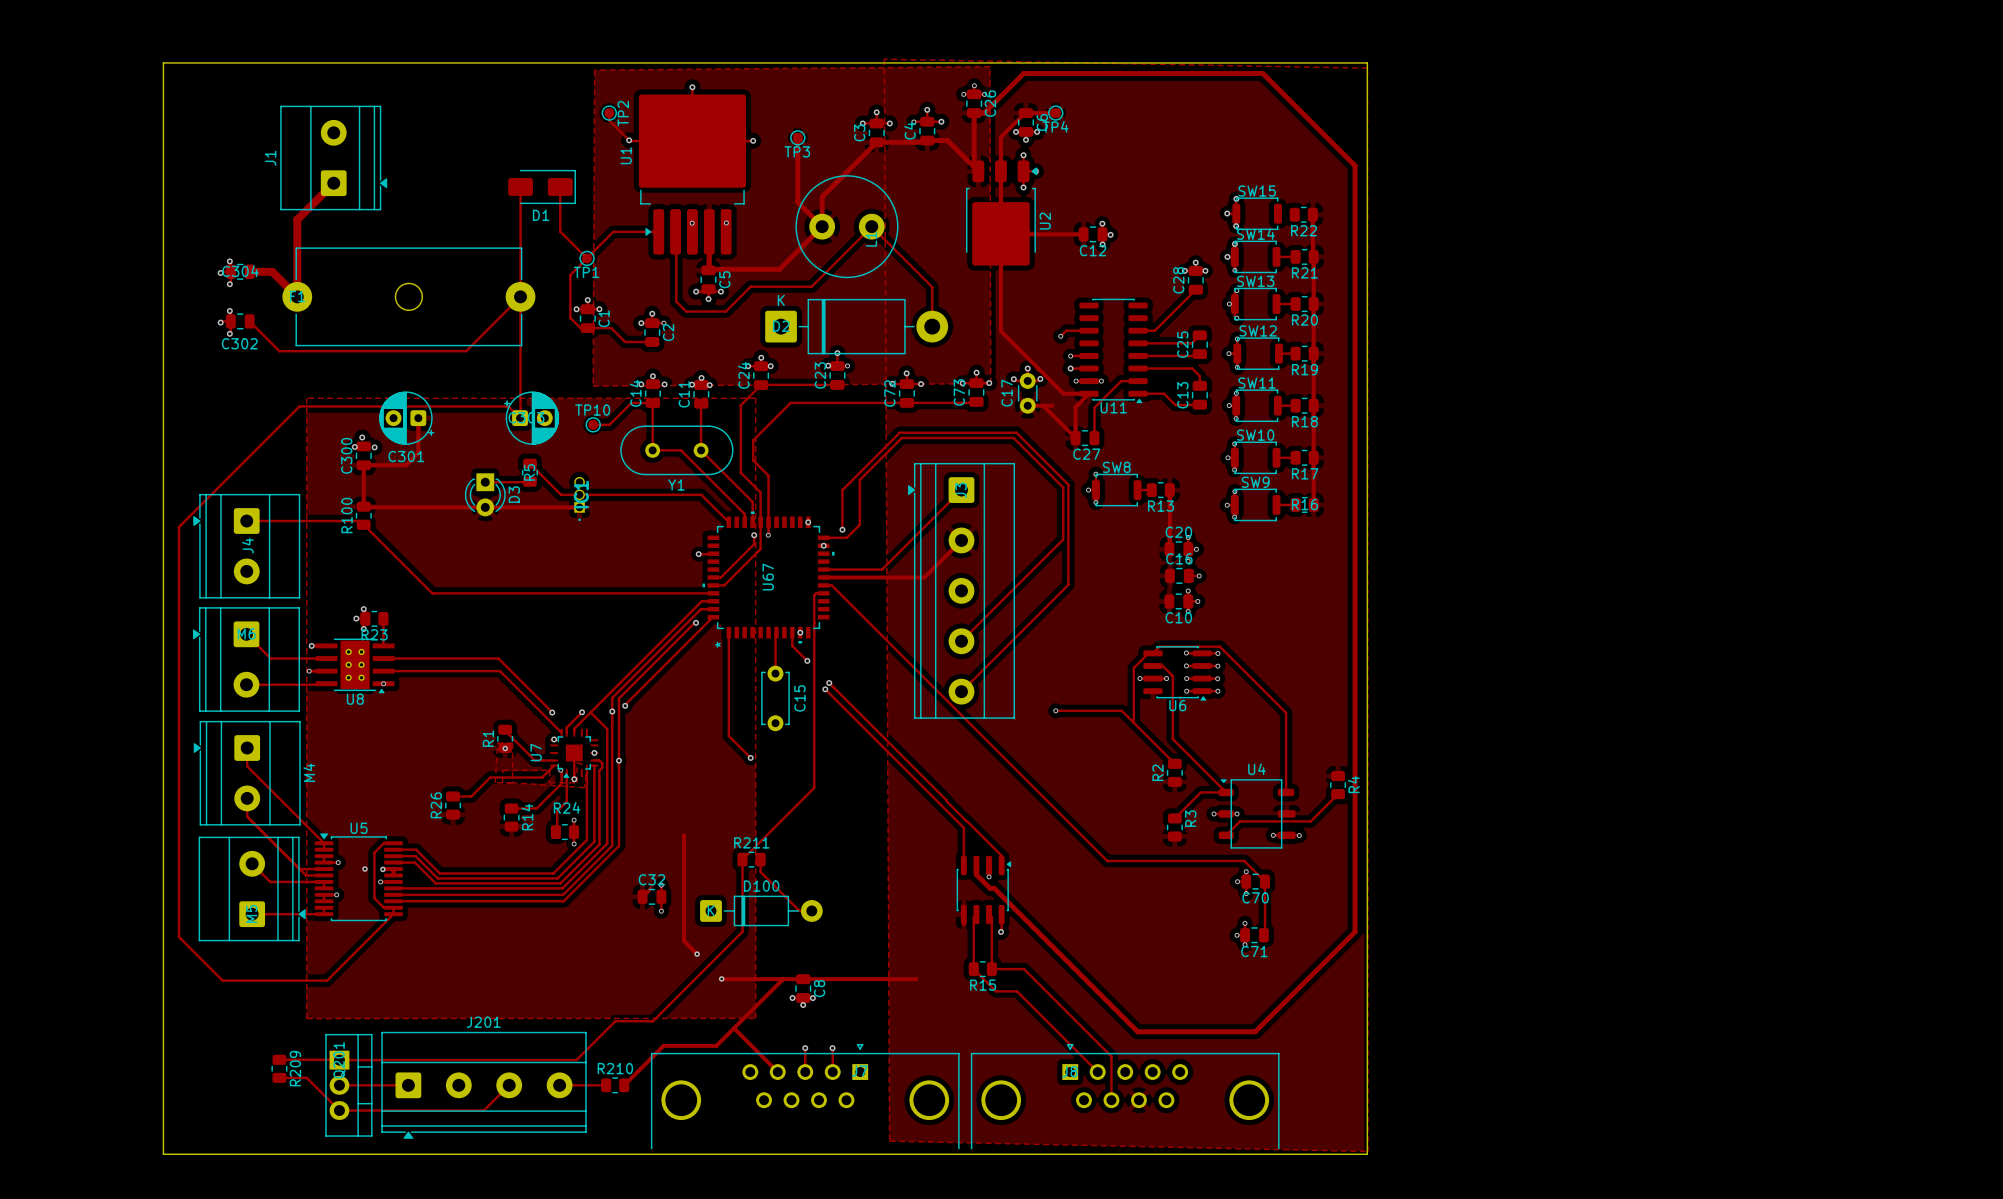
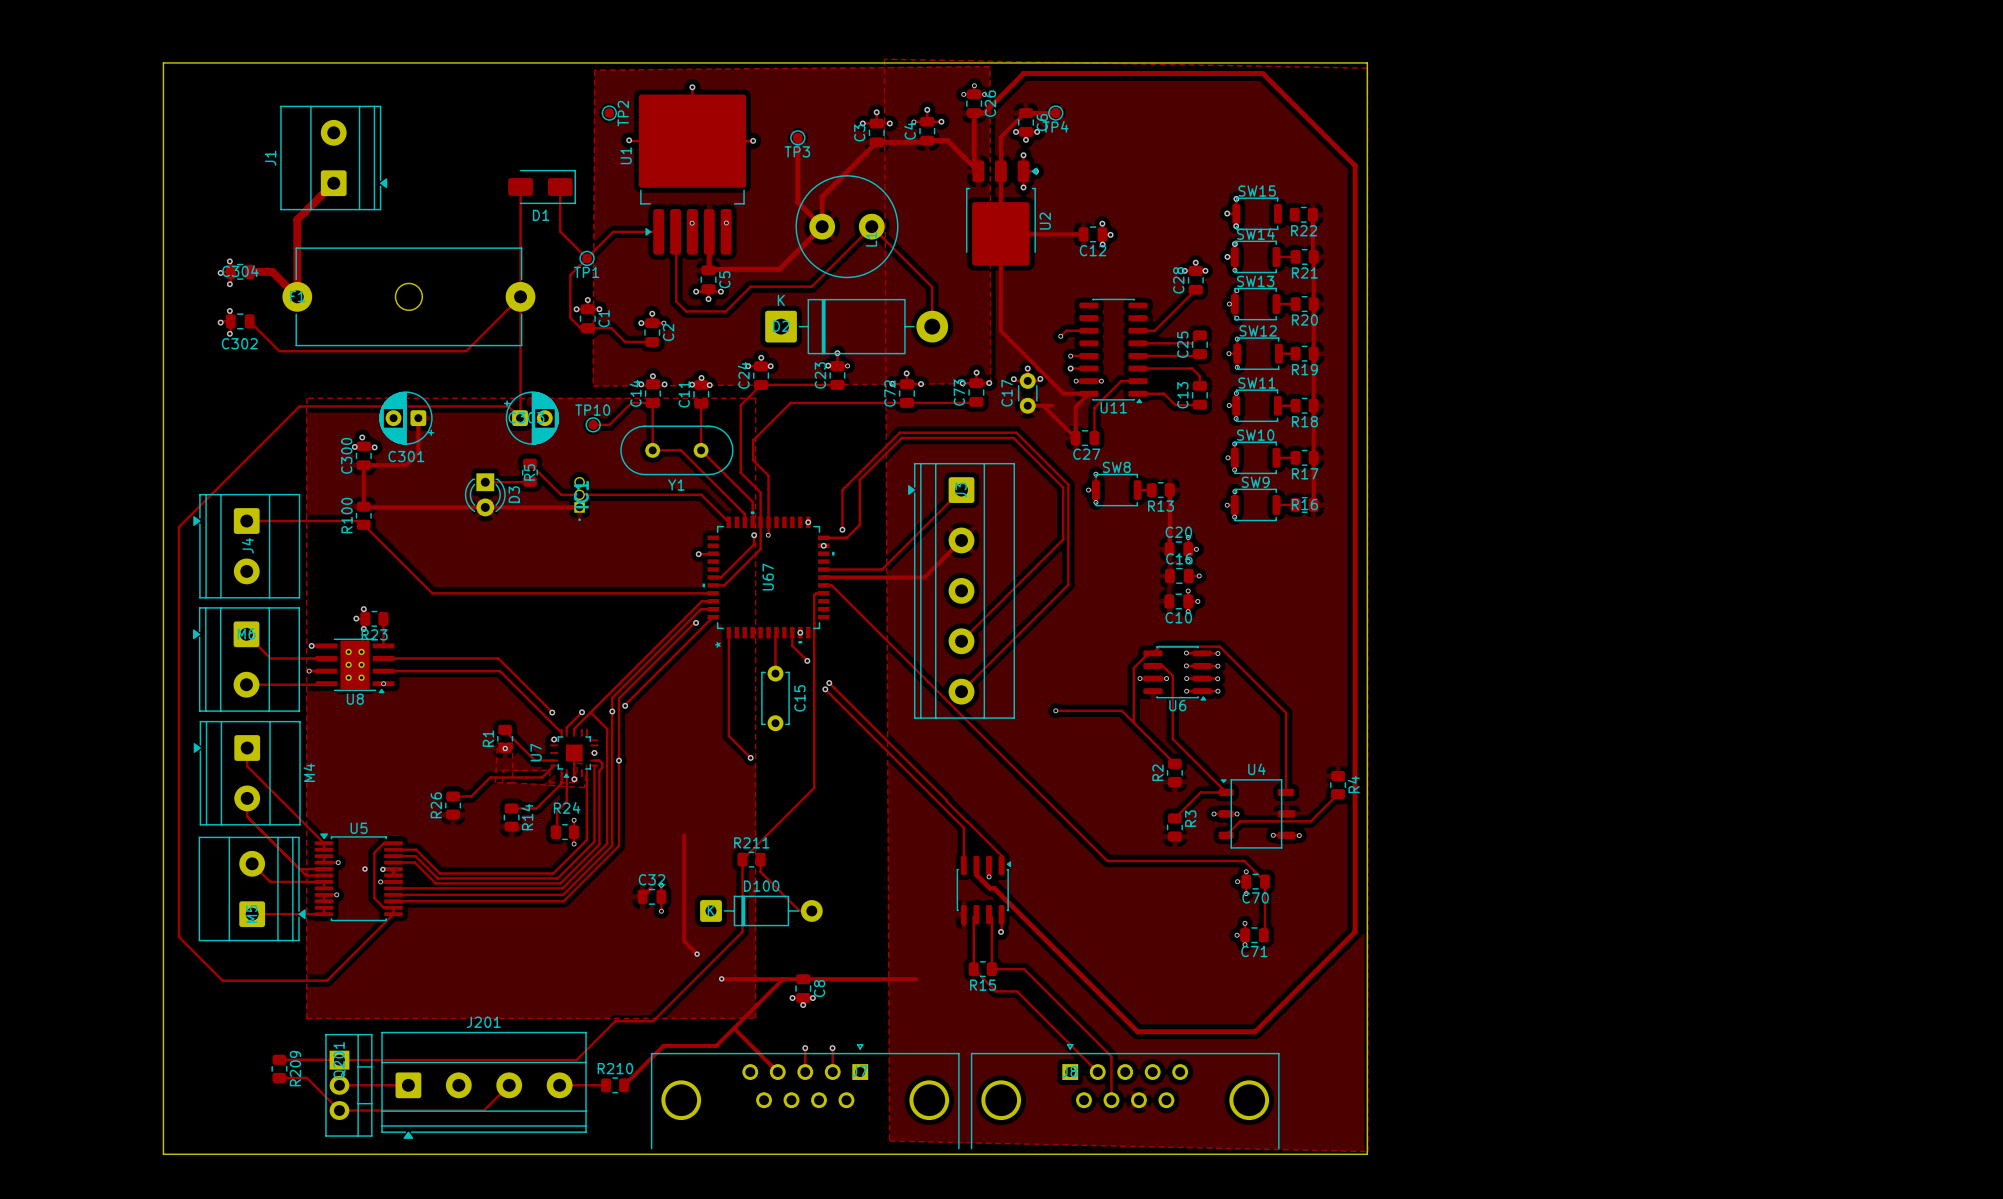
track: (609, 113) (609, 120) (629, 140) -> none
via: (560, 770) -> none

